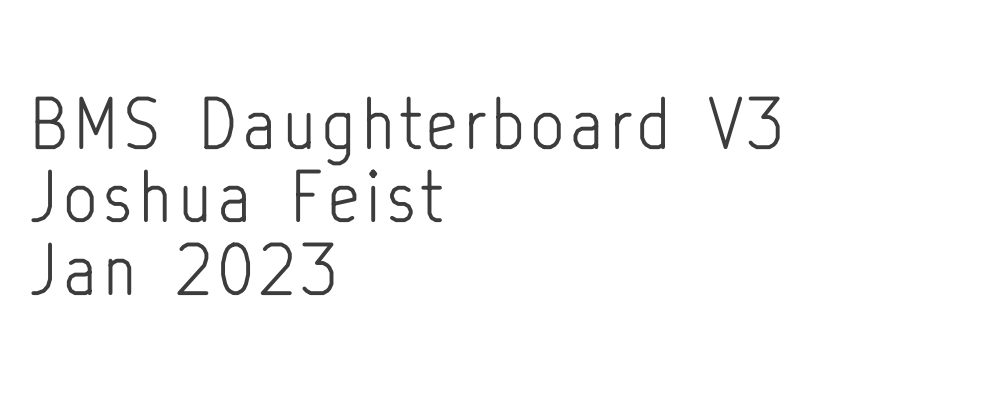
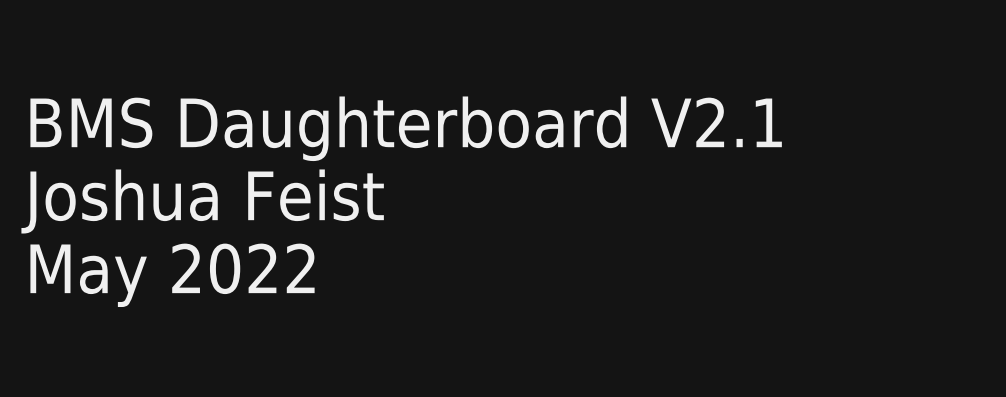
text: BMS Daughterboard V3 (407, 130) -> BMS Daughterboard V2.1 (406, 128)
text: Jan 2023 (182, 268) -> May 2022 (172, 275)

